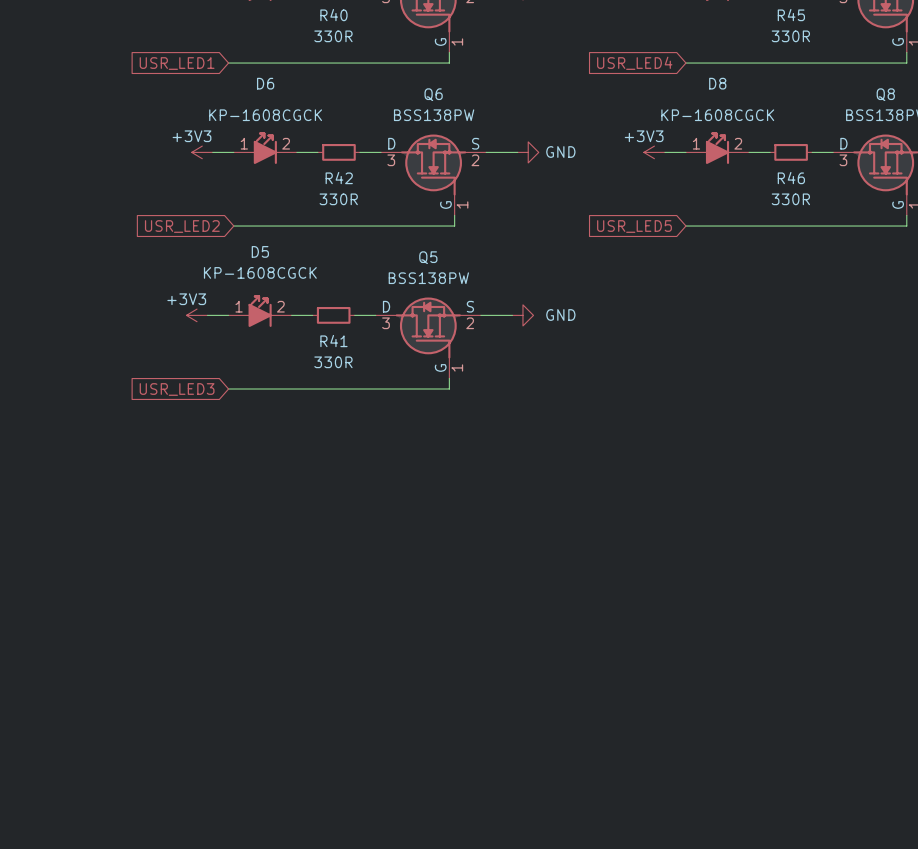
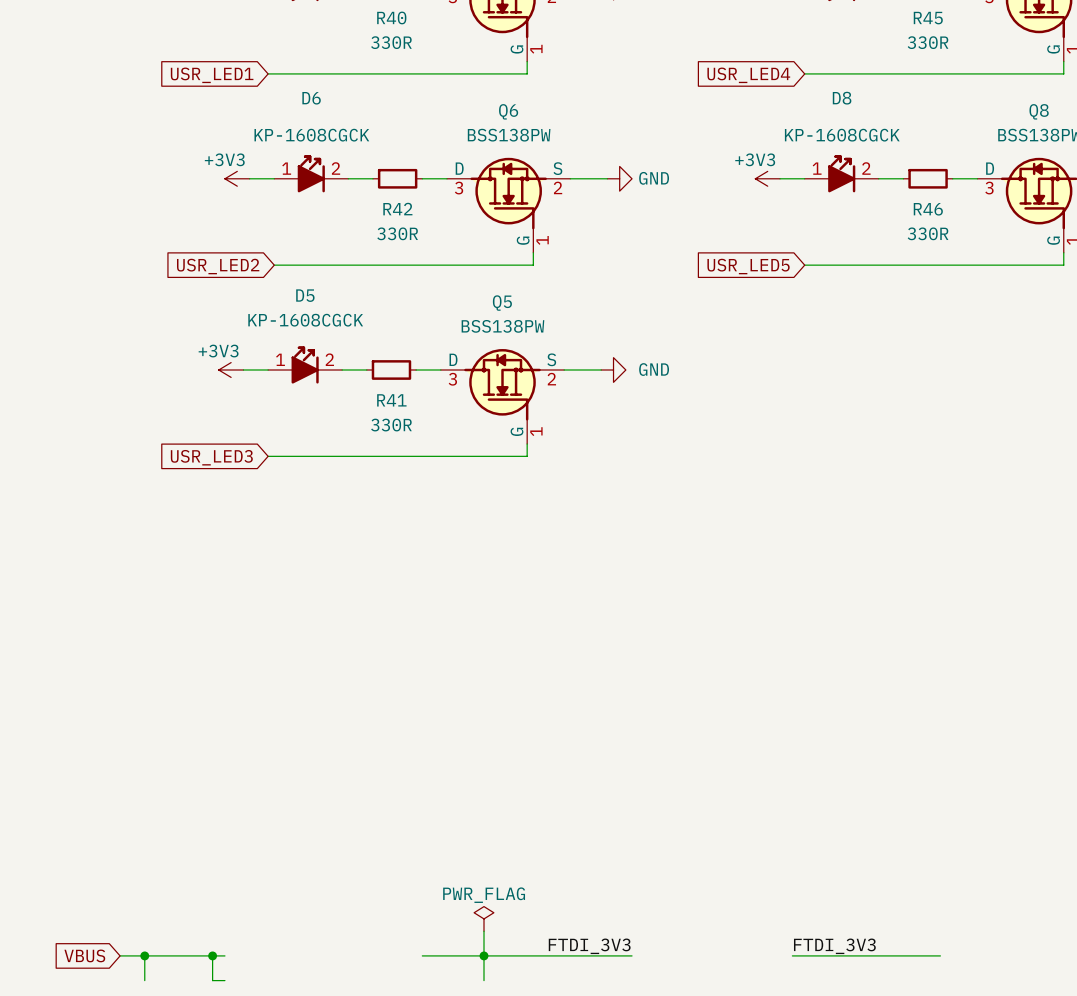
power symbol: none -> PWR_FLAG (483, 918)
wire: none -> (483, 931) (483, 980)
label: none -> FTDI_3V3 (589, 946)
label: none -> FTDI_3V3 (834, 946)
global label: none -> VBUS (84, 955)
wire: none -> (120, 955) (224, 955)
wire: none -> (144, 955) (144, 980)
junction: none -> (144, 955)
wire: none -> (212, 955) (212, 980) (224, 980)
junction: none -> (212, 955)
wire: none -> (422, 955) (632, 955)
junction: none -> (483, 955)
wire: none -> (792, 955) (940, 955)

